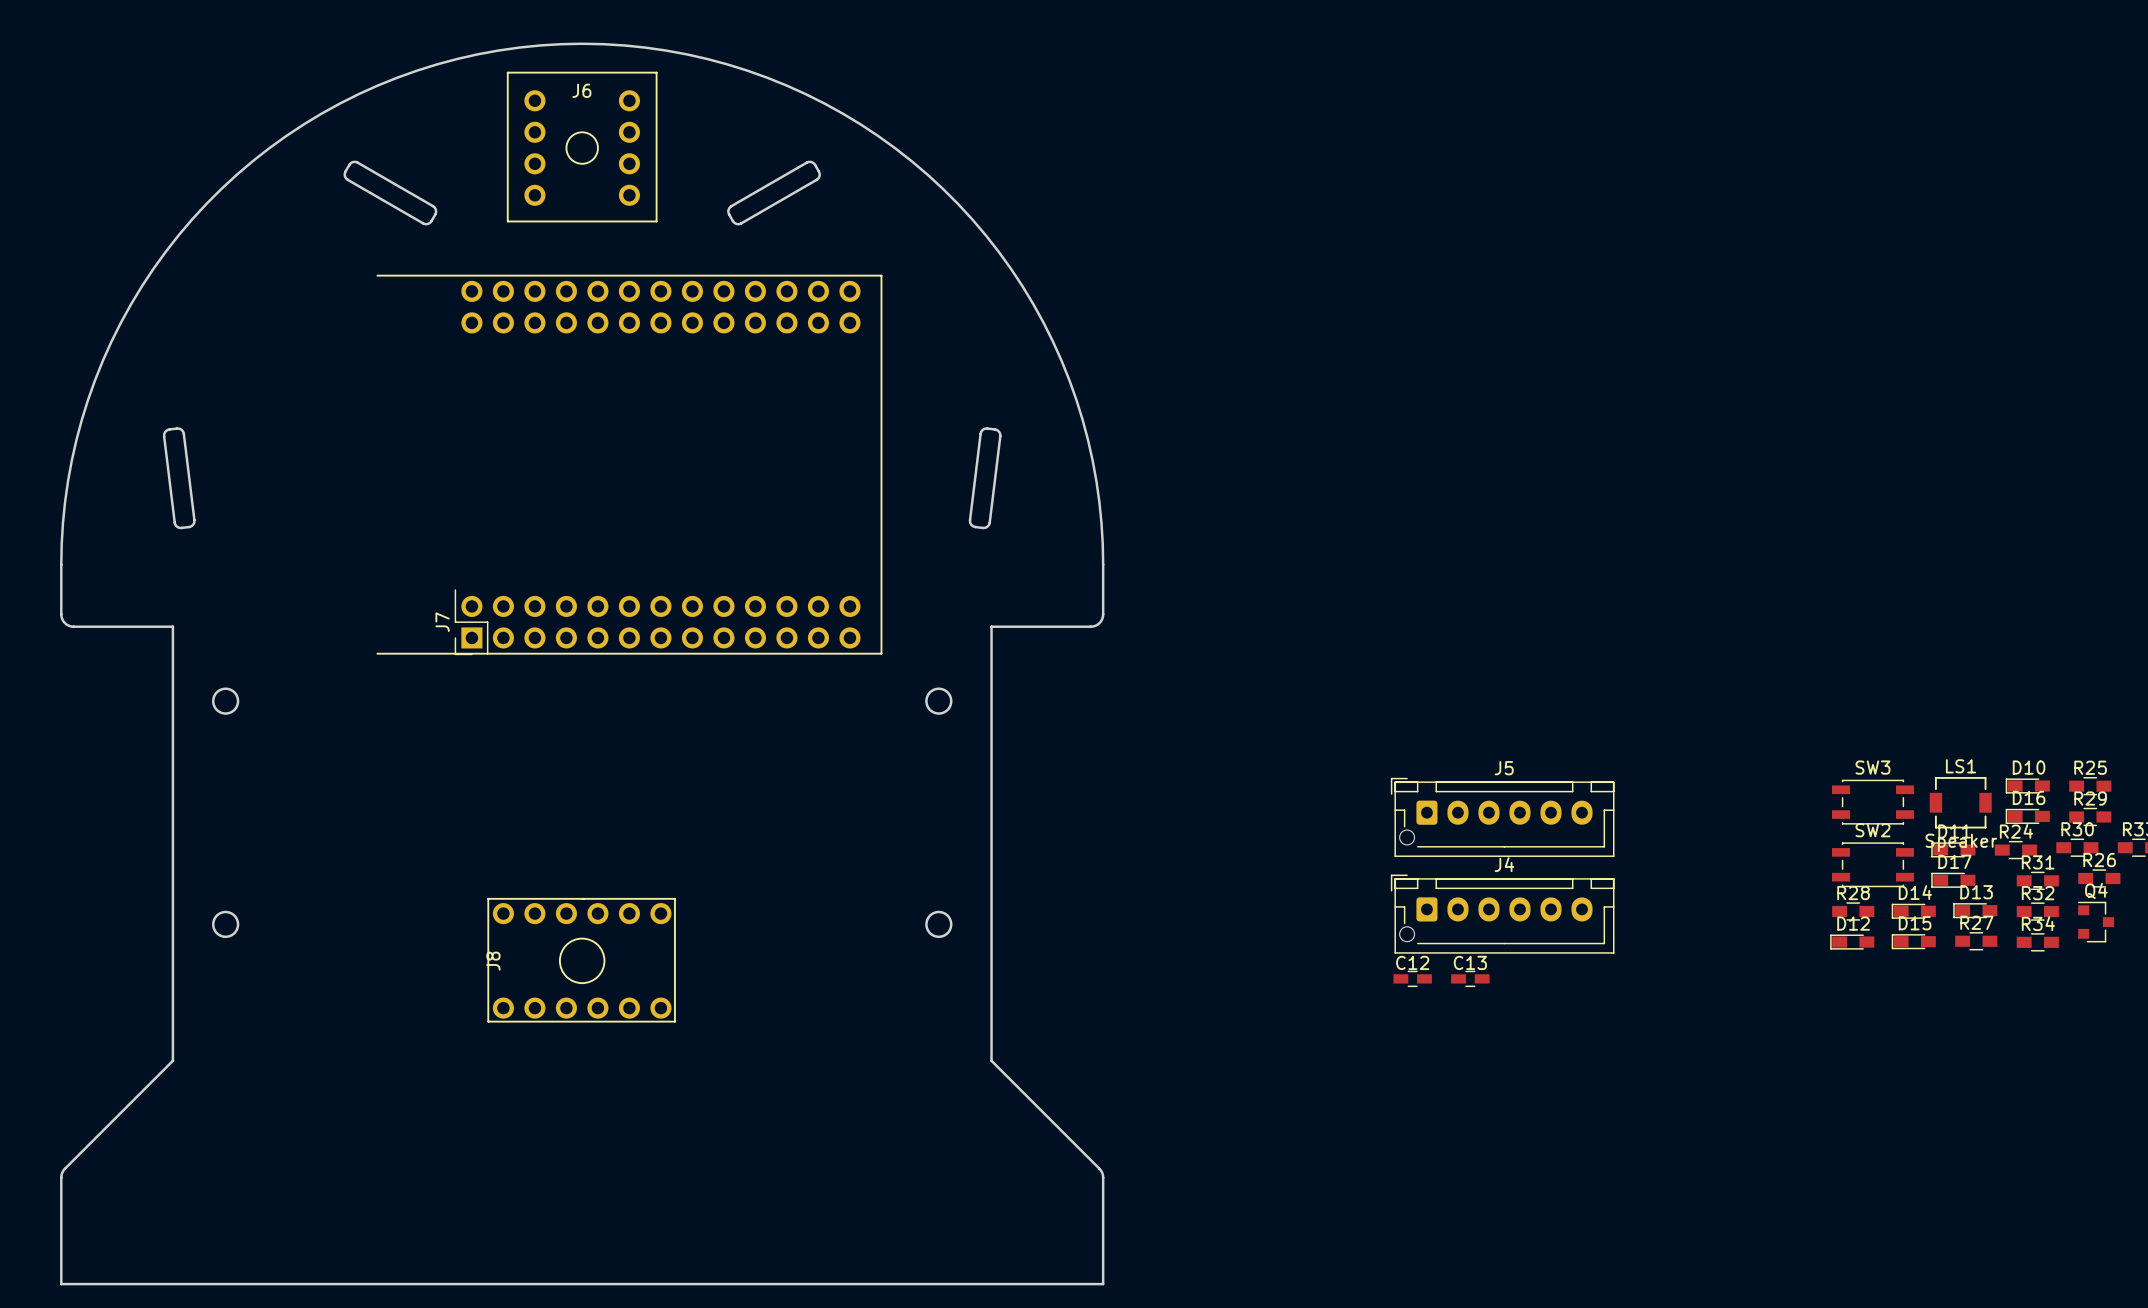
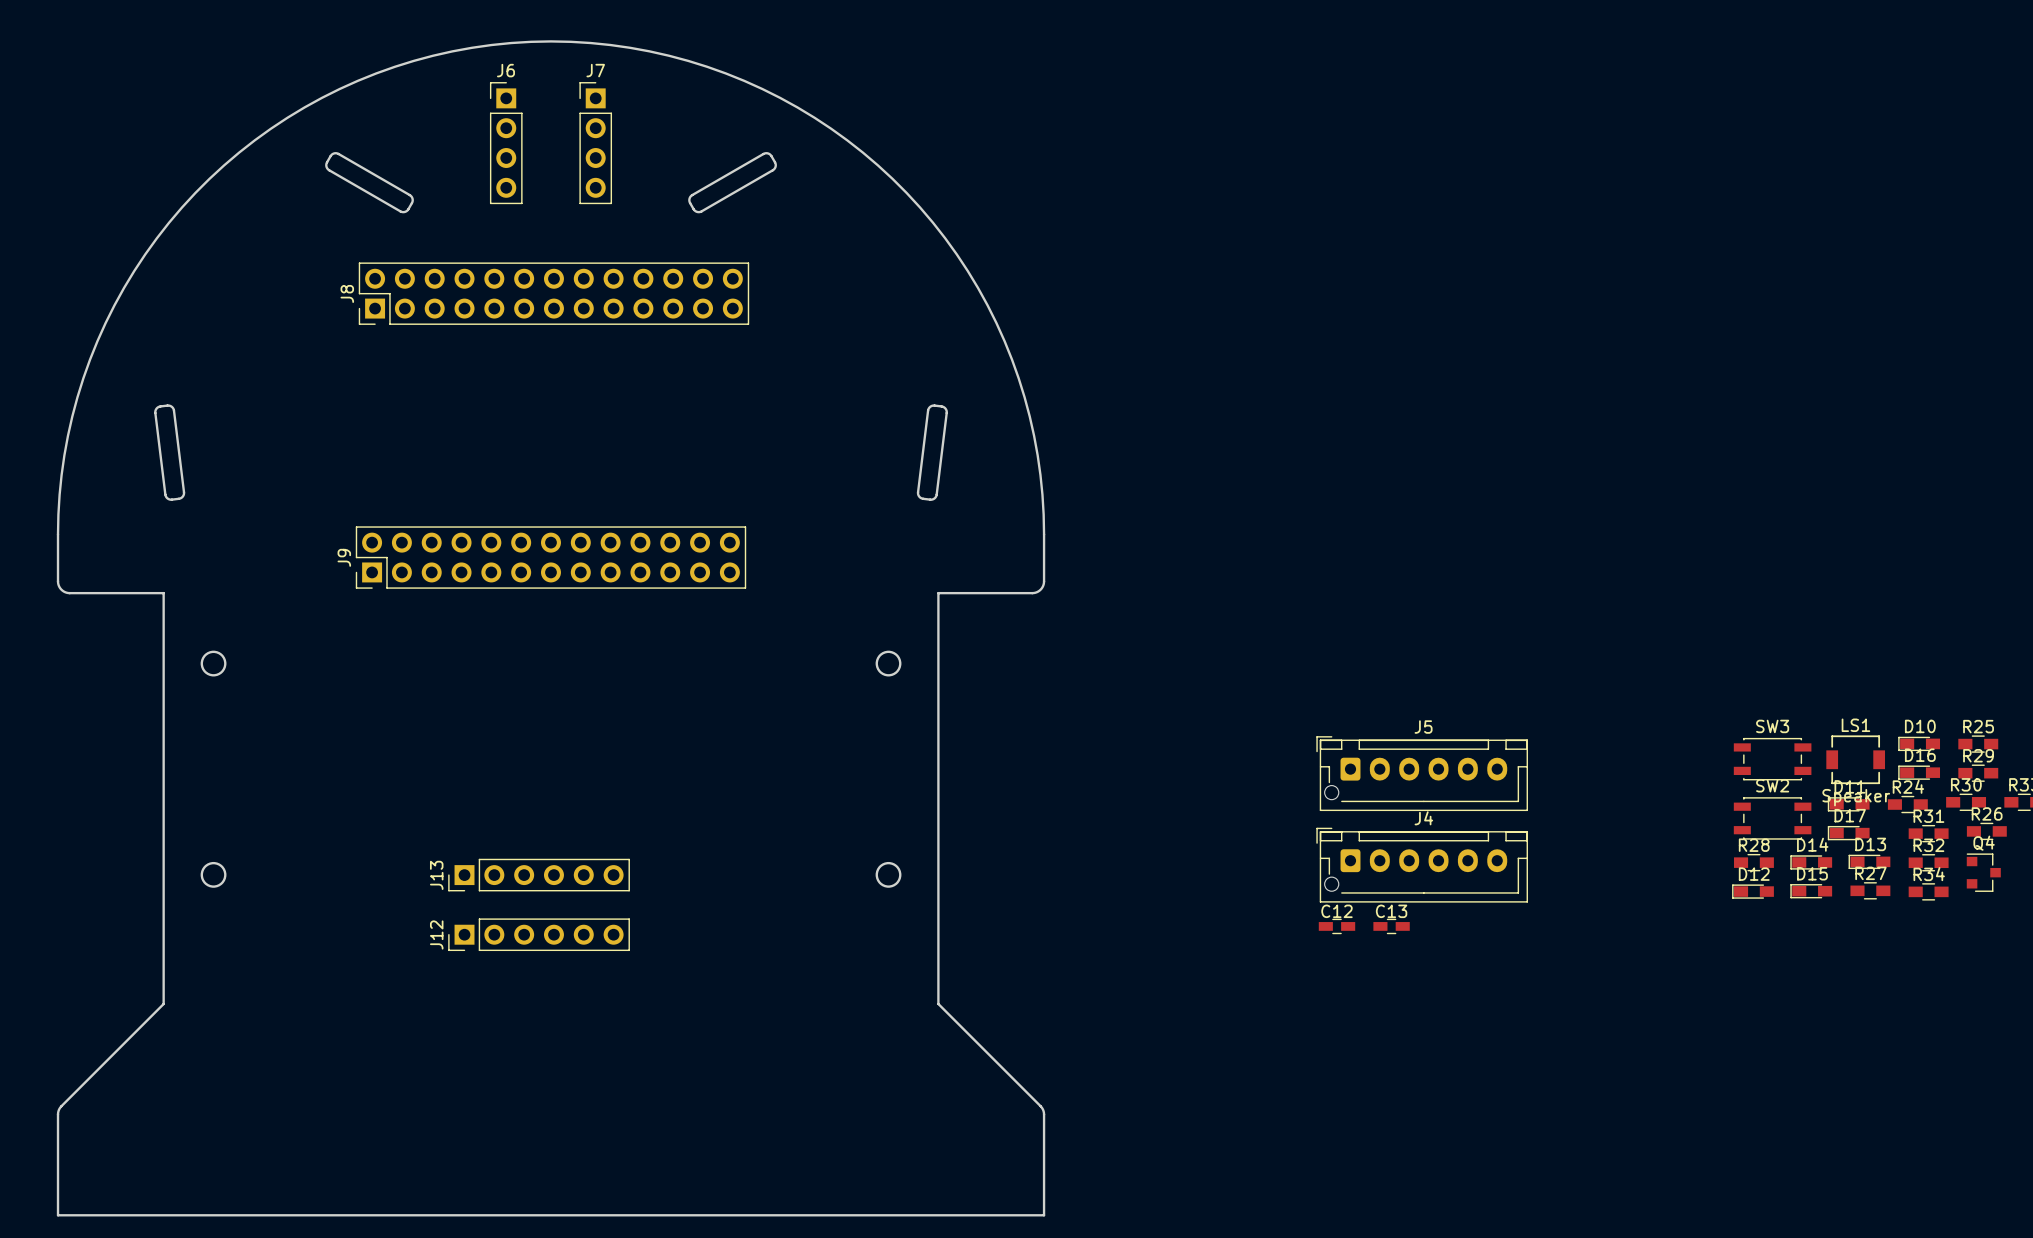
J6 footprint: [506, 71, 658, 223] -> [489, 82, 523, 205]
J7 footprint: [376, 274, 883, 656] -> [579, 82, 613, 205]
J9: none -> (550, 557)
J7 name position: J7 (442, 622) -> J7 (595, 70)
J8 footprint: [487, 897, 676, 1023] -> [358, 262, 750, 325]
J13: none -> (539, 875)
J8 name position: J8 (493, 961) -> J8 (347, 293)
J12: none -> (539, 934)

